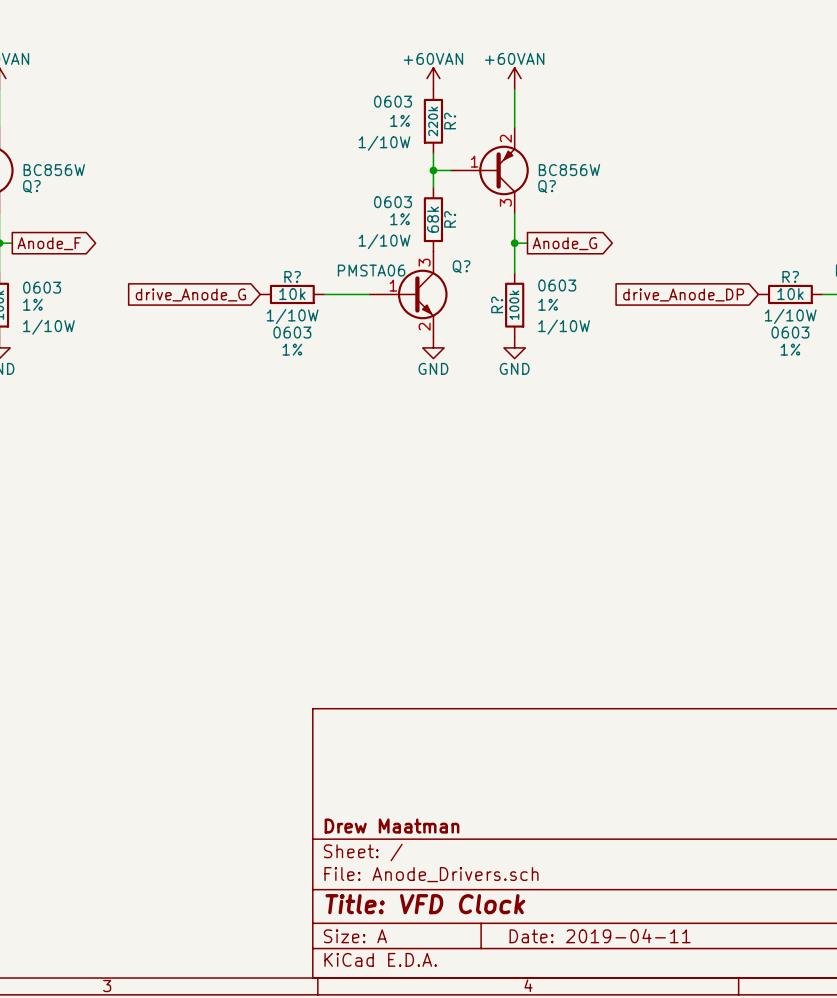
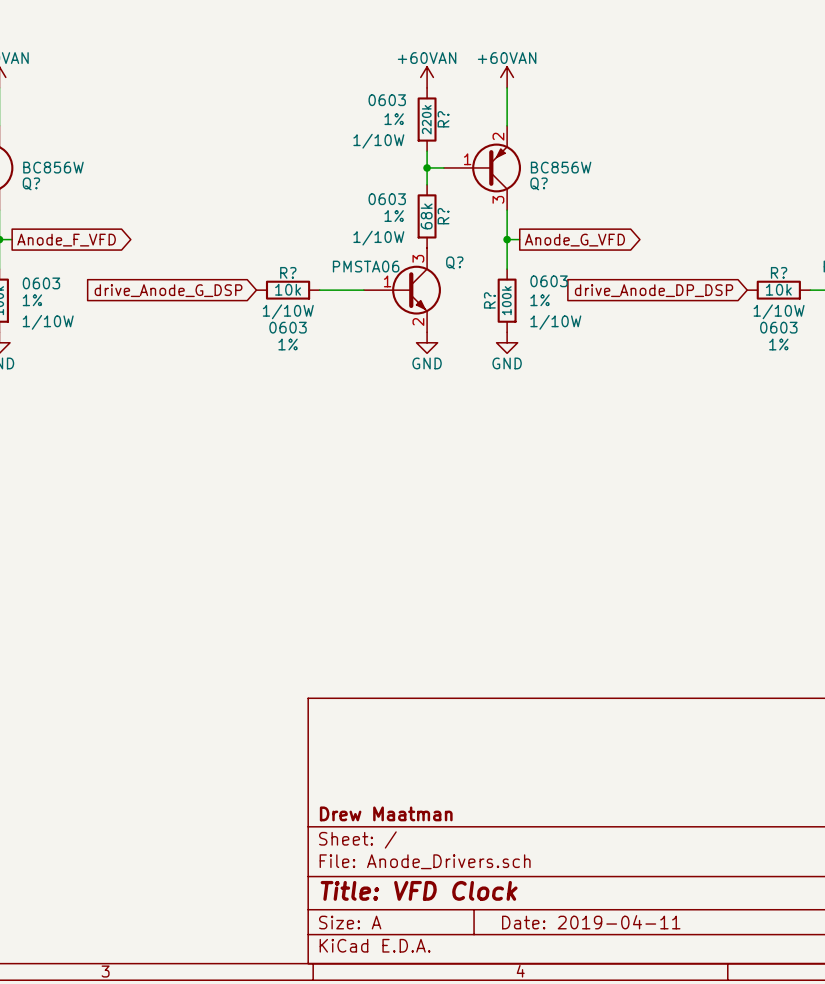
global label: Anode_F (49, 243) -> Anode_F_VFD (66, 240)
global label: Anode_G (564, 243) -> Anode_G_VFD (574, 240)
global label: drive_Anode_G (190, 294) -> drive_Anode_G_DSP (168, 290)
global label: drive_Anode_DP (683, 294) -> drive_Anode_DP_DSP (654, 290)

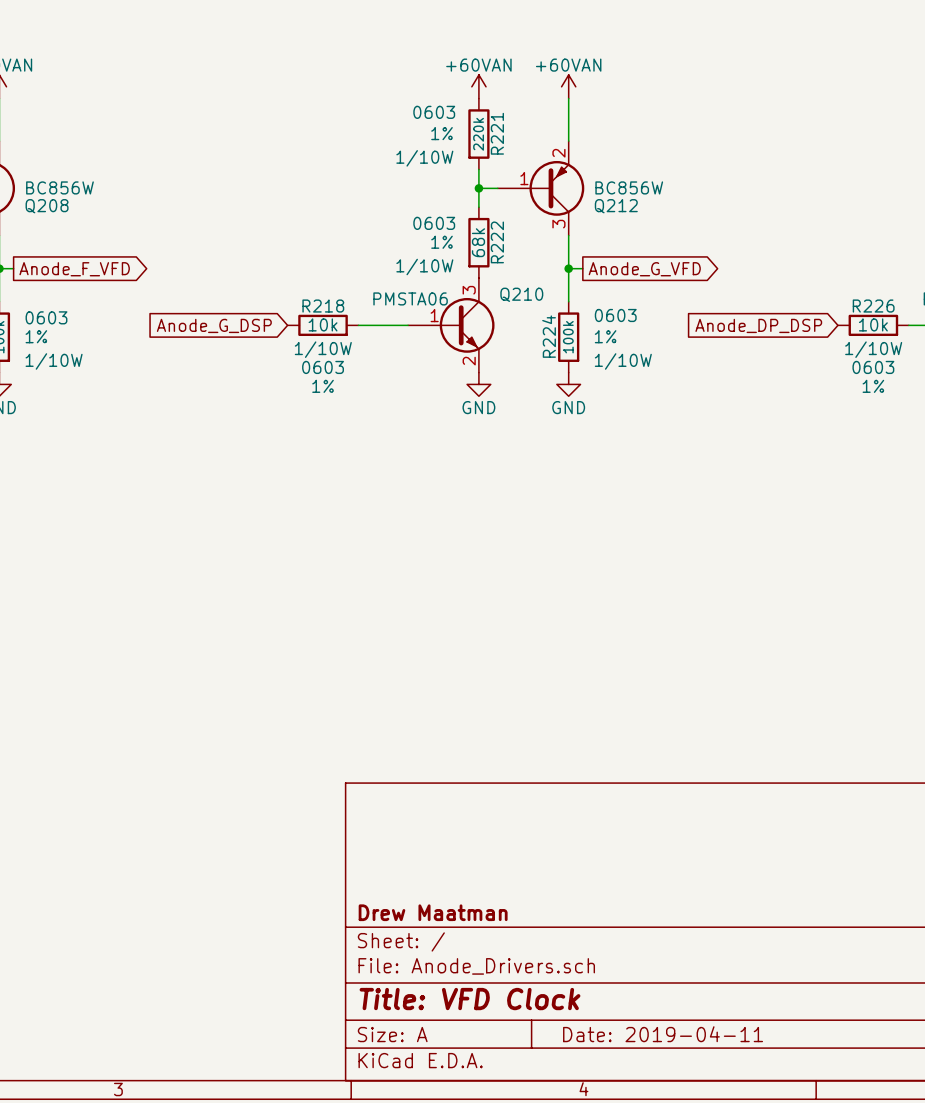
R? name: R? (443, 119) -> R221 (497, 133)
Q? name: Q? (31, 183) -> Q208 (47, 206)
Q? name: Q? (539, 183) -> Q212 (616, 206)
R? name: R? (443, 216) -> R222 (497, 242)
Q? name: Q? (454, 262) -> Q210 (521, 294)
R? name: R? (288, 272) -> R218 (323, 306)
R? name: R? (779, 272) -> R226 (873, 306)
global label: drive_Anode_G_DSP (168, 290) -> Anode_G_DSP (214, 325)
global label: drive_Anode_DP_DSP (654, 290) -> Anode_DP_DSP (758, 325)
R? name: R? (489, 300) -> R224 (549, 336)

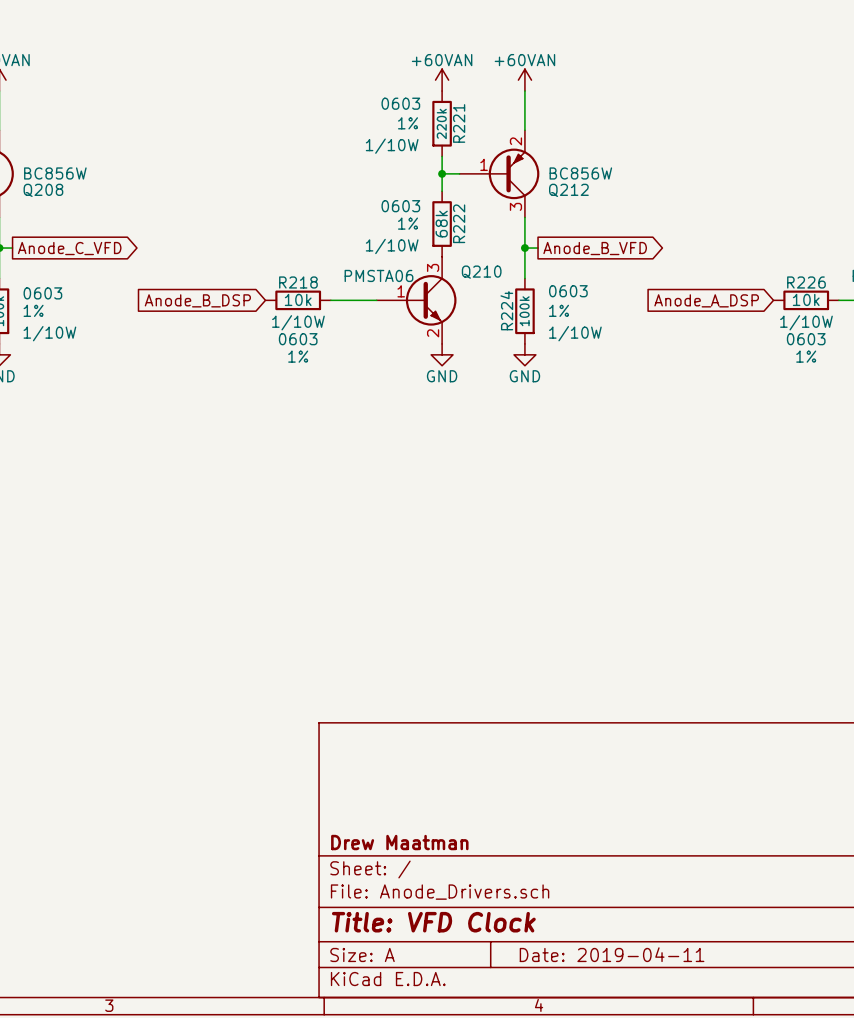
global label: Anode_F_VFD (74, 269) -> Anode_C_VFD (69, 248)
global label: Anode_G_VFD (644, 269) -> Anode_B_VFD (595, 248)
global label: Anode_G_DSP (214, 325) -> Anode_B_DSP (197, 300)
global label: Anode_DP_DSP (758, 325) -> Anode_A_DSP (706, 300)

